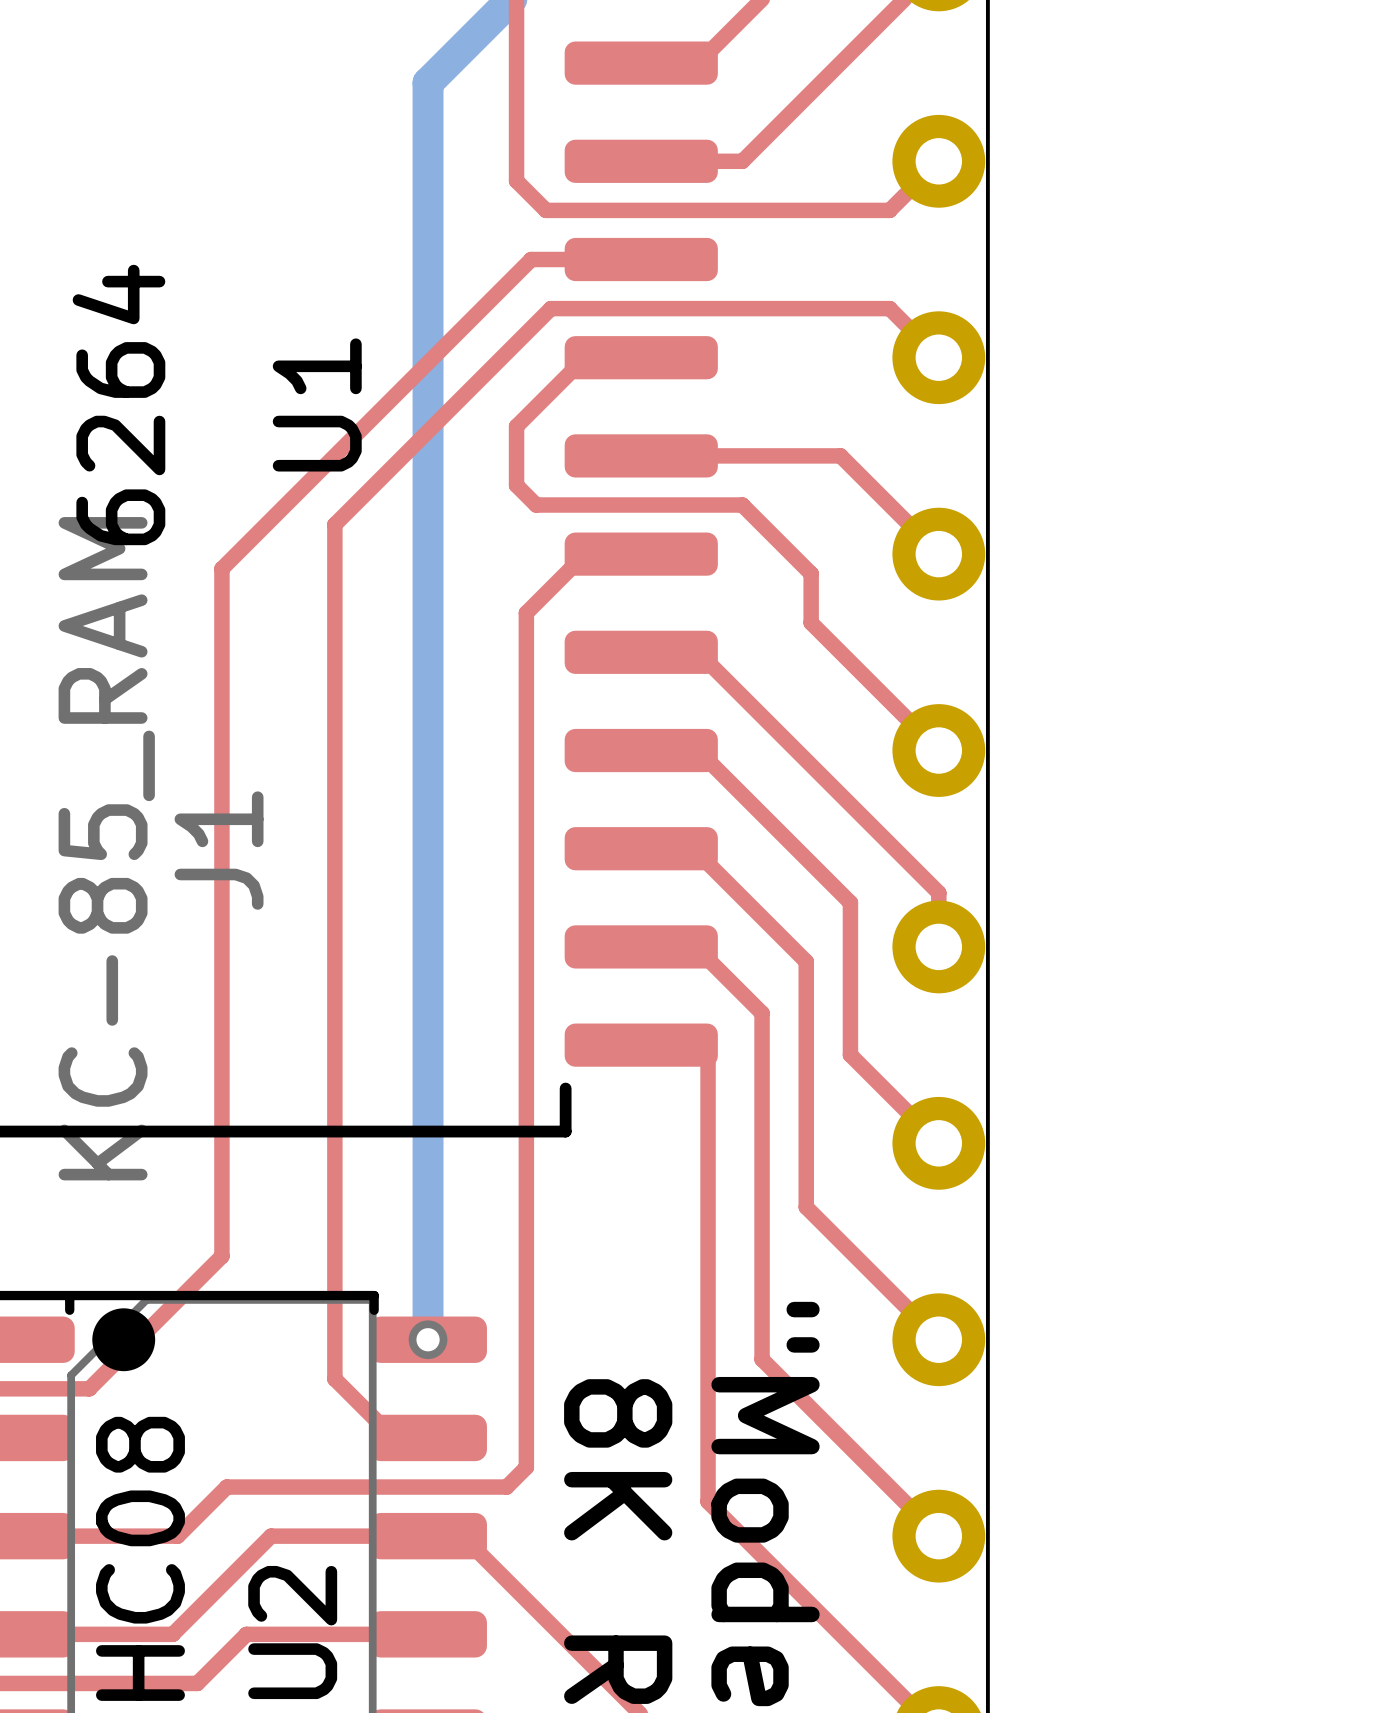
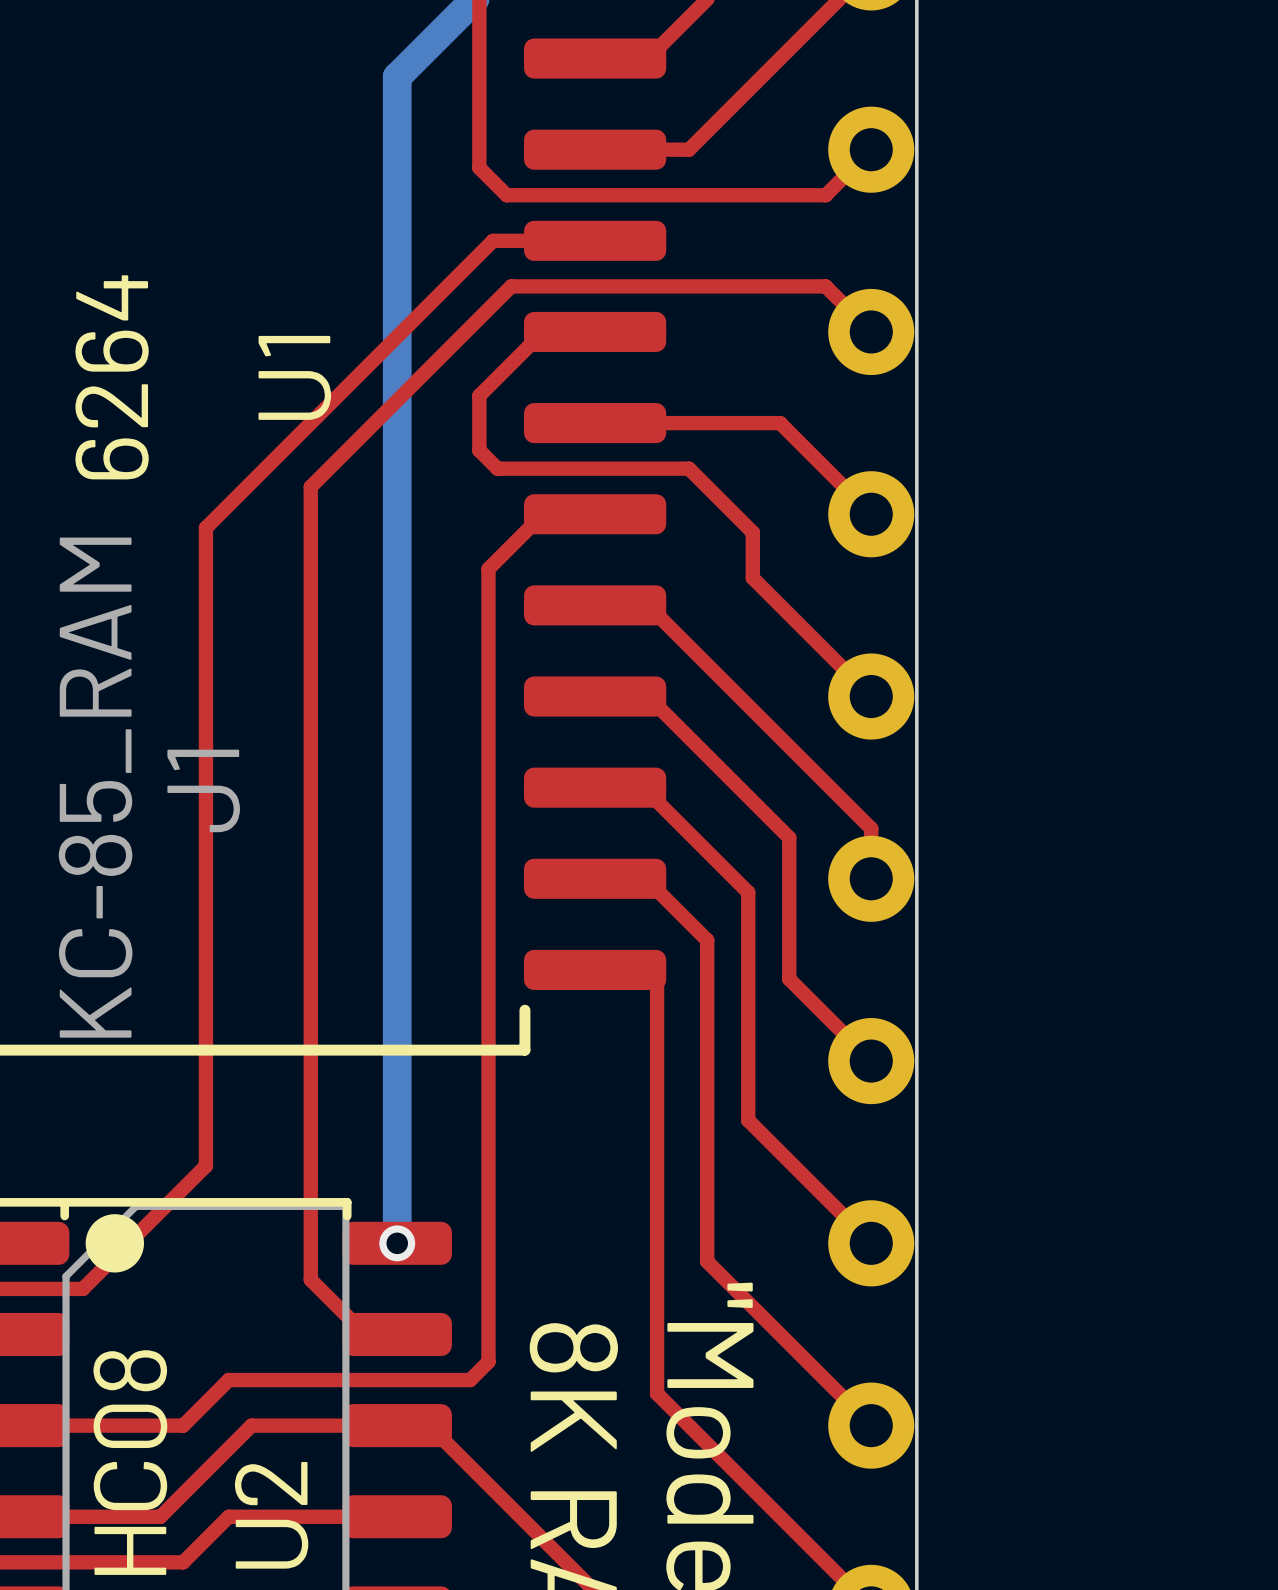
top track: (246, 1487) (226, 1487) (177, 1536) -> (228, 1380) (183, 1425) (164, 1425)

